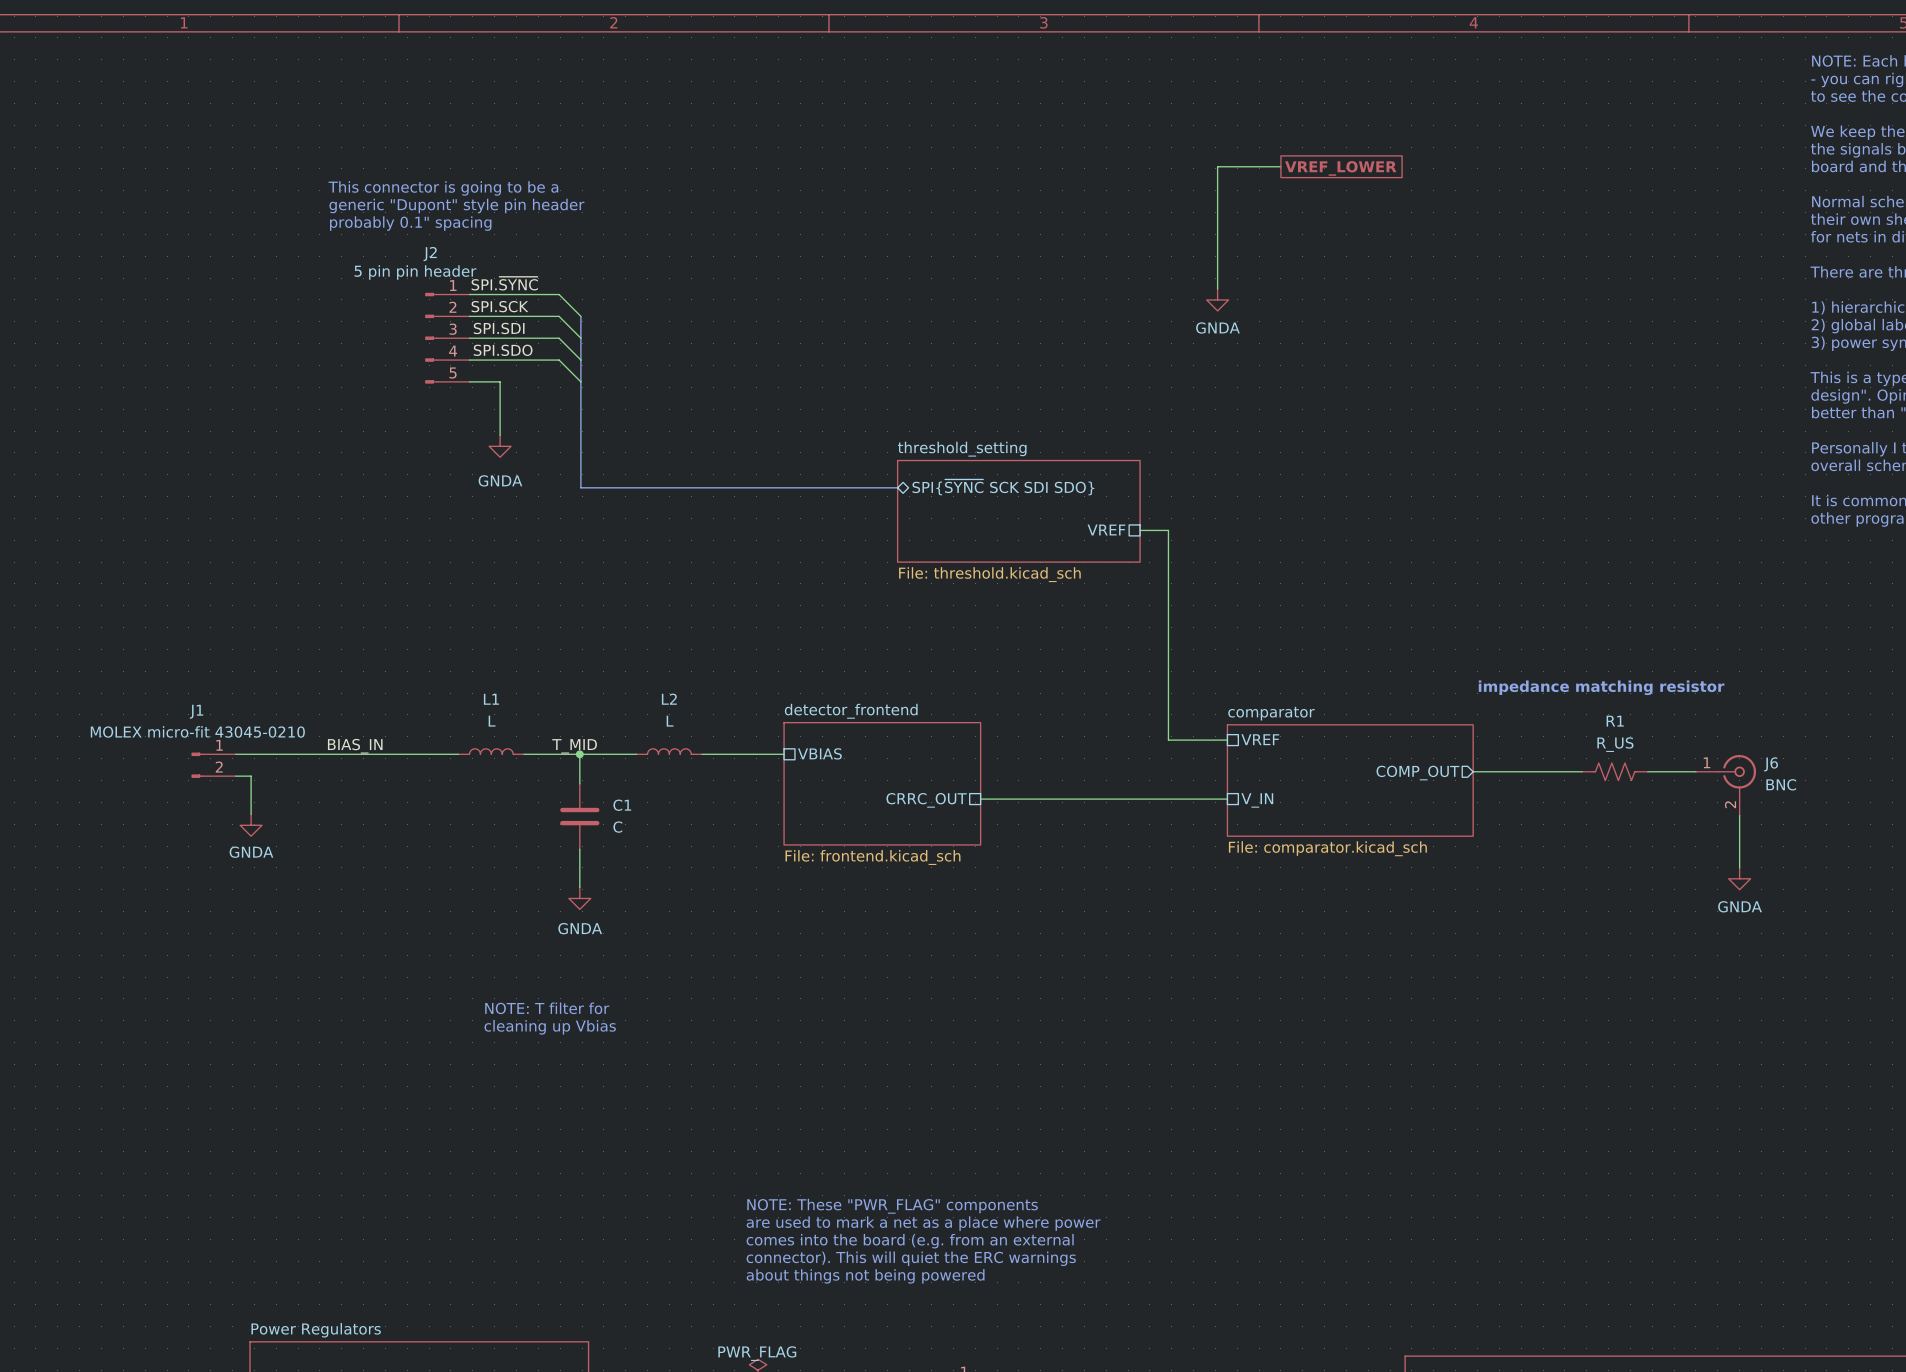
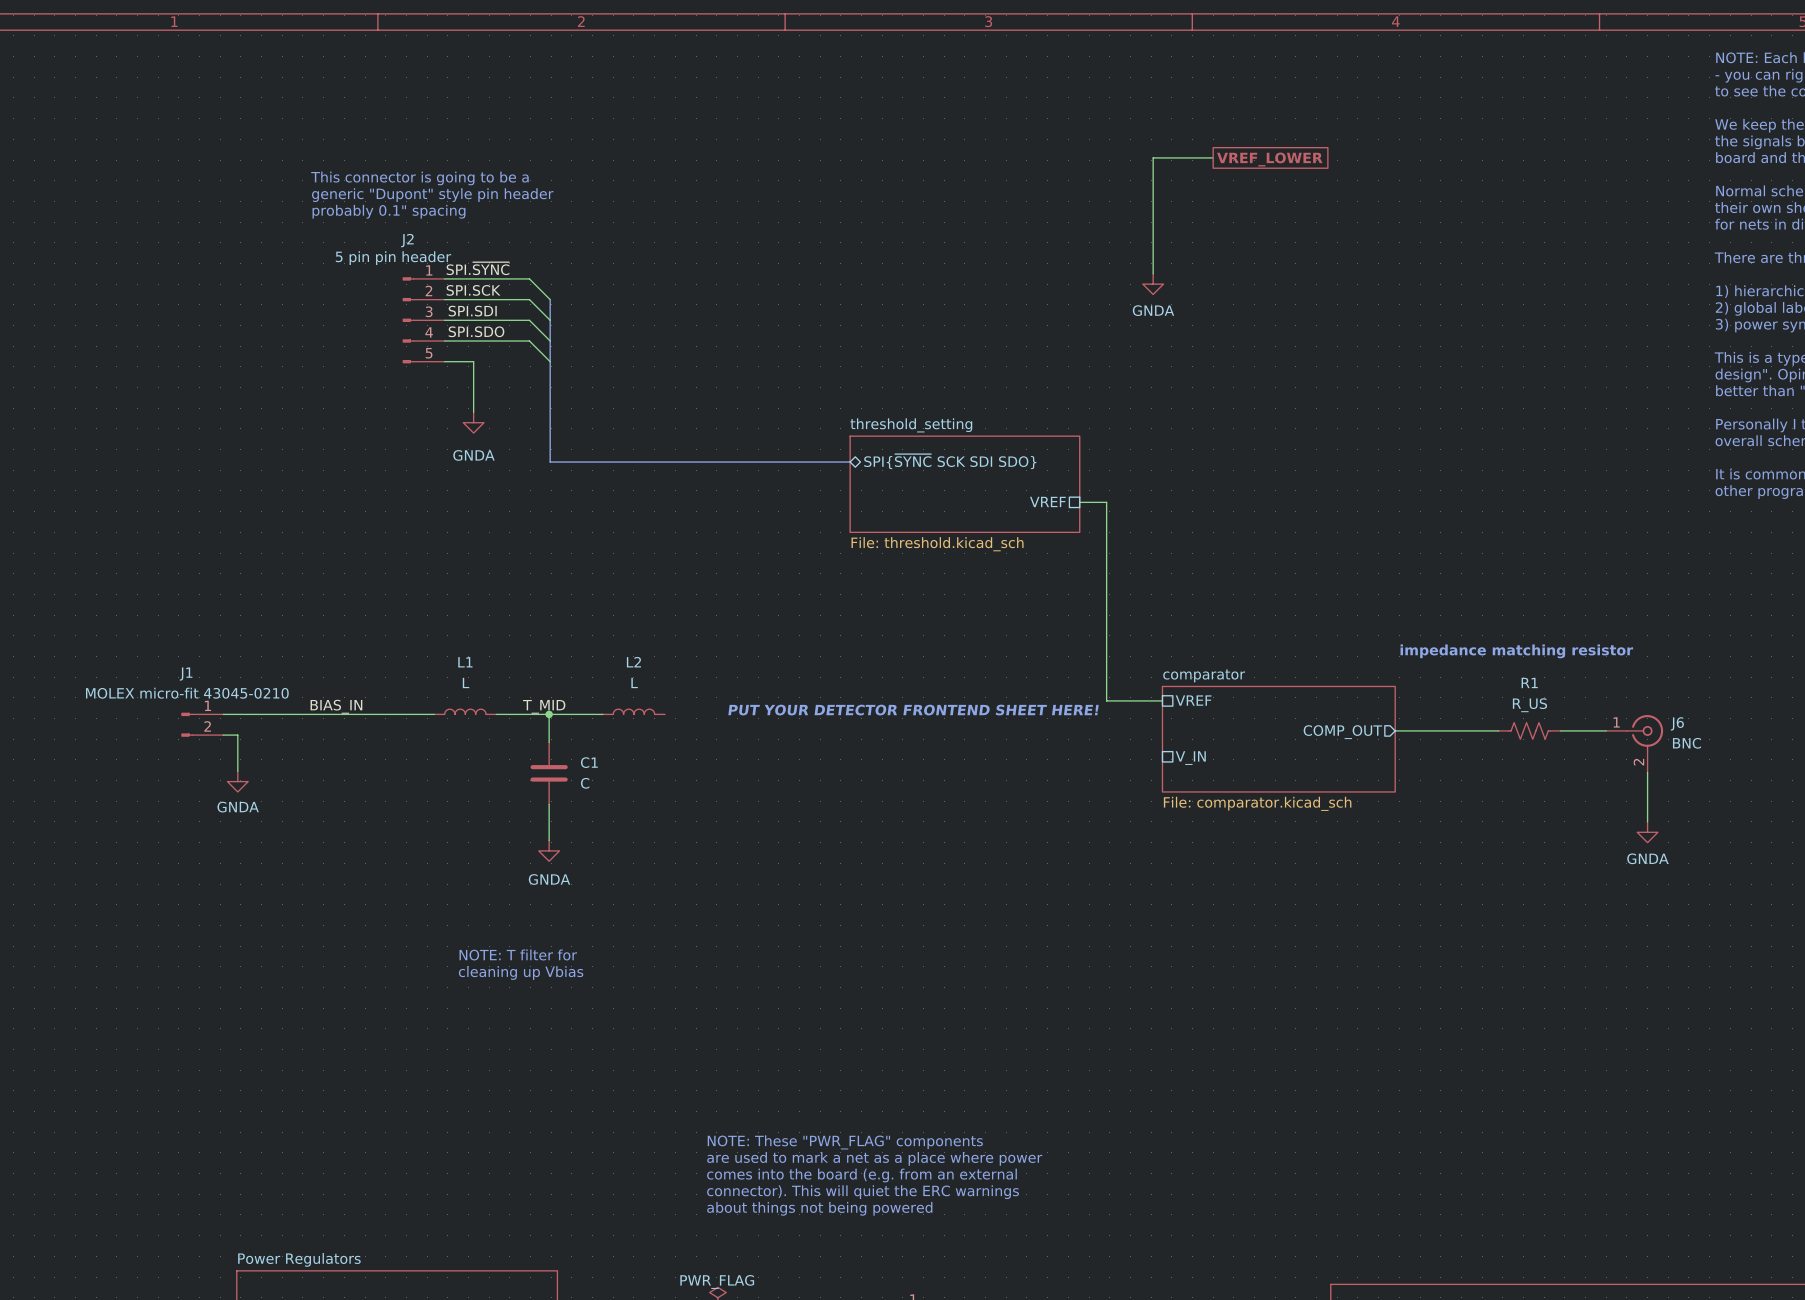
text: none -> PUT YOUR DETECTOR FRONTEND SHEET HERE! (913, 710)
sheet pin: VBIAS (819, 753) -> none
wire: (702, 754) (784, 754) -> none
sheet detector_frontend: File: frontend.kicad_sch (882, 783) -> none
wire: (980, 799) (1227, 799) -> none
sheet pin: CRRC_OUT (926, 800) -> none

